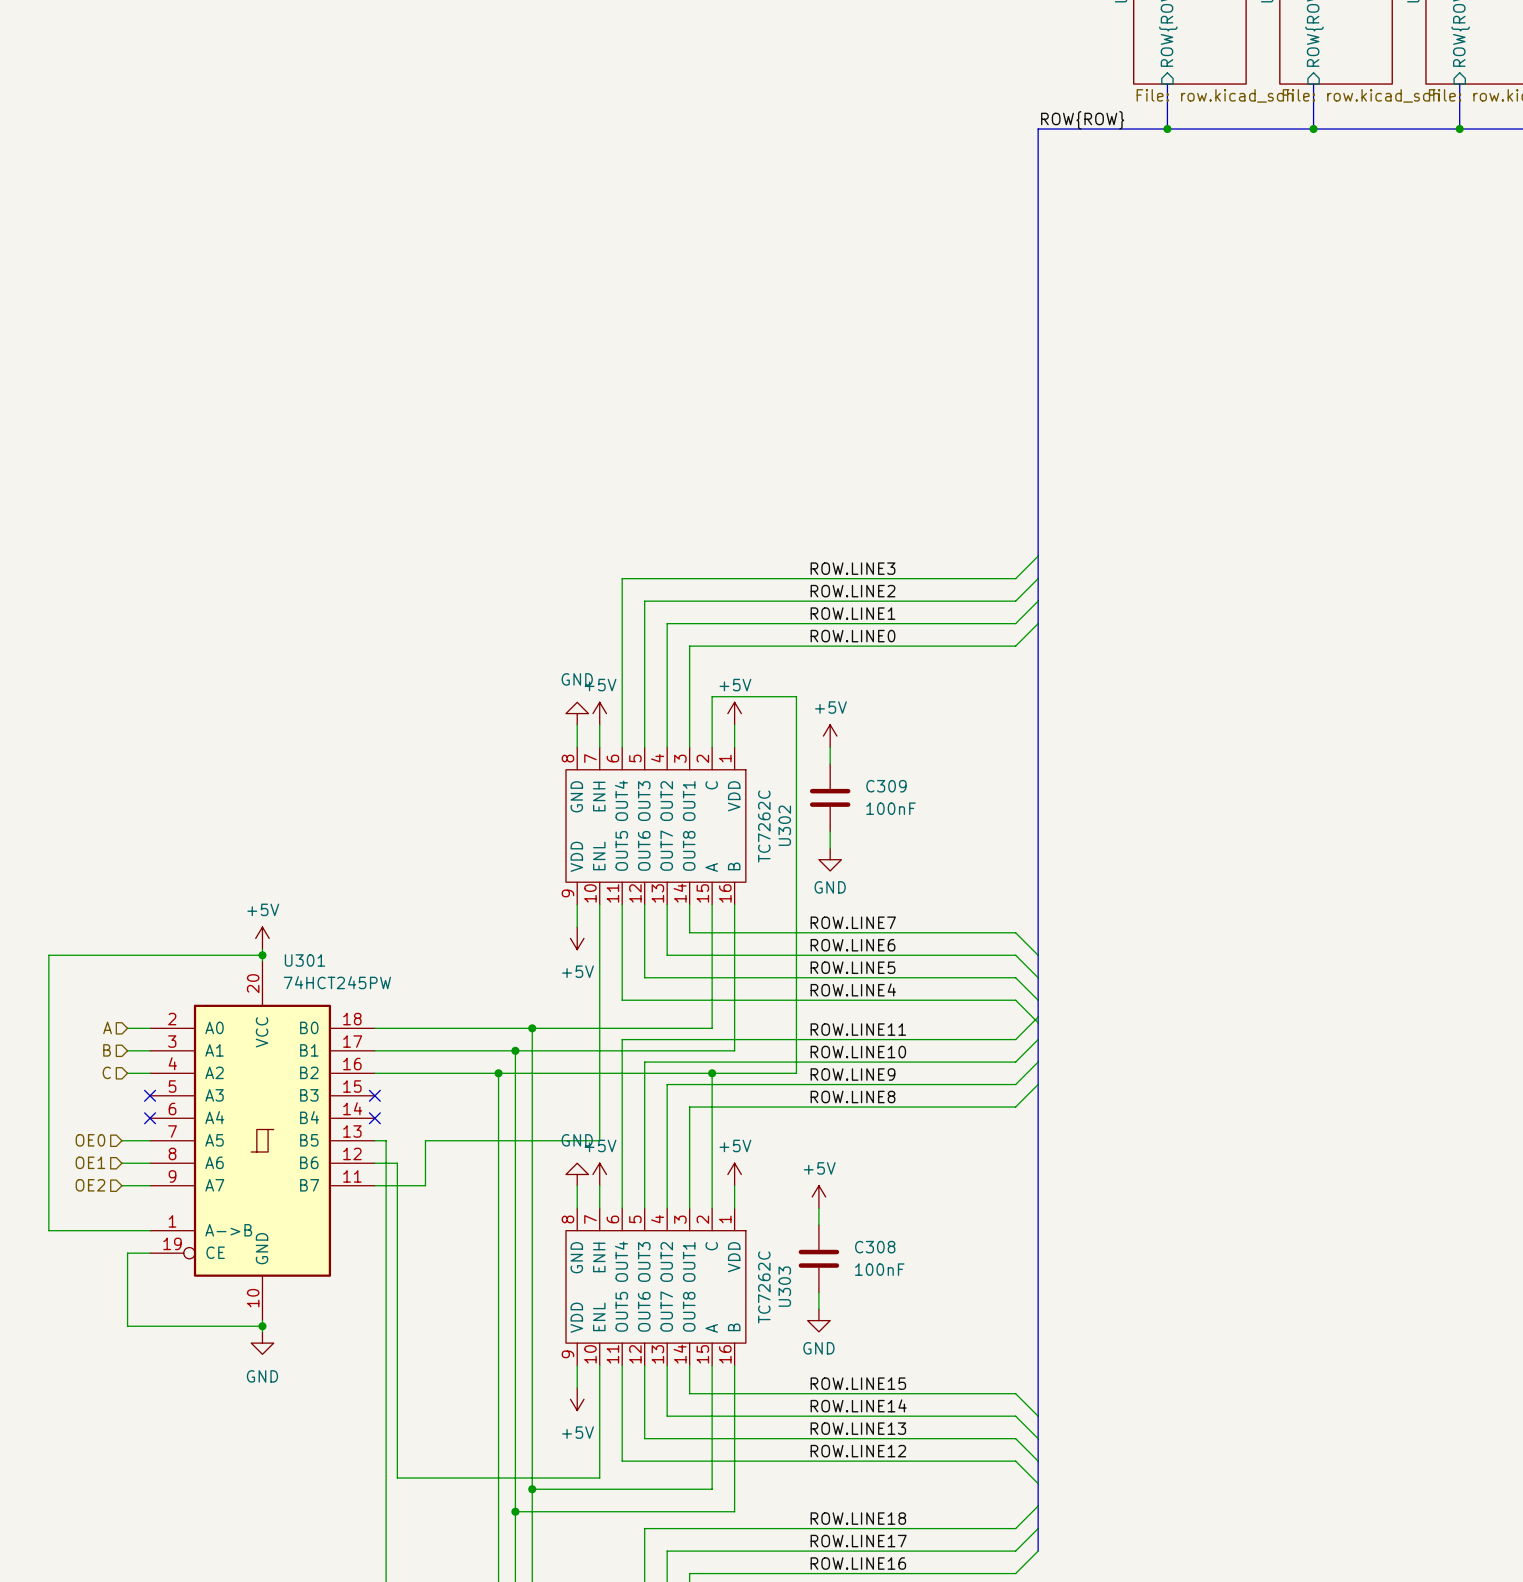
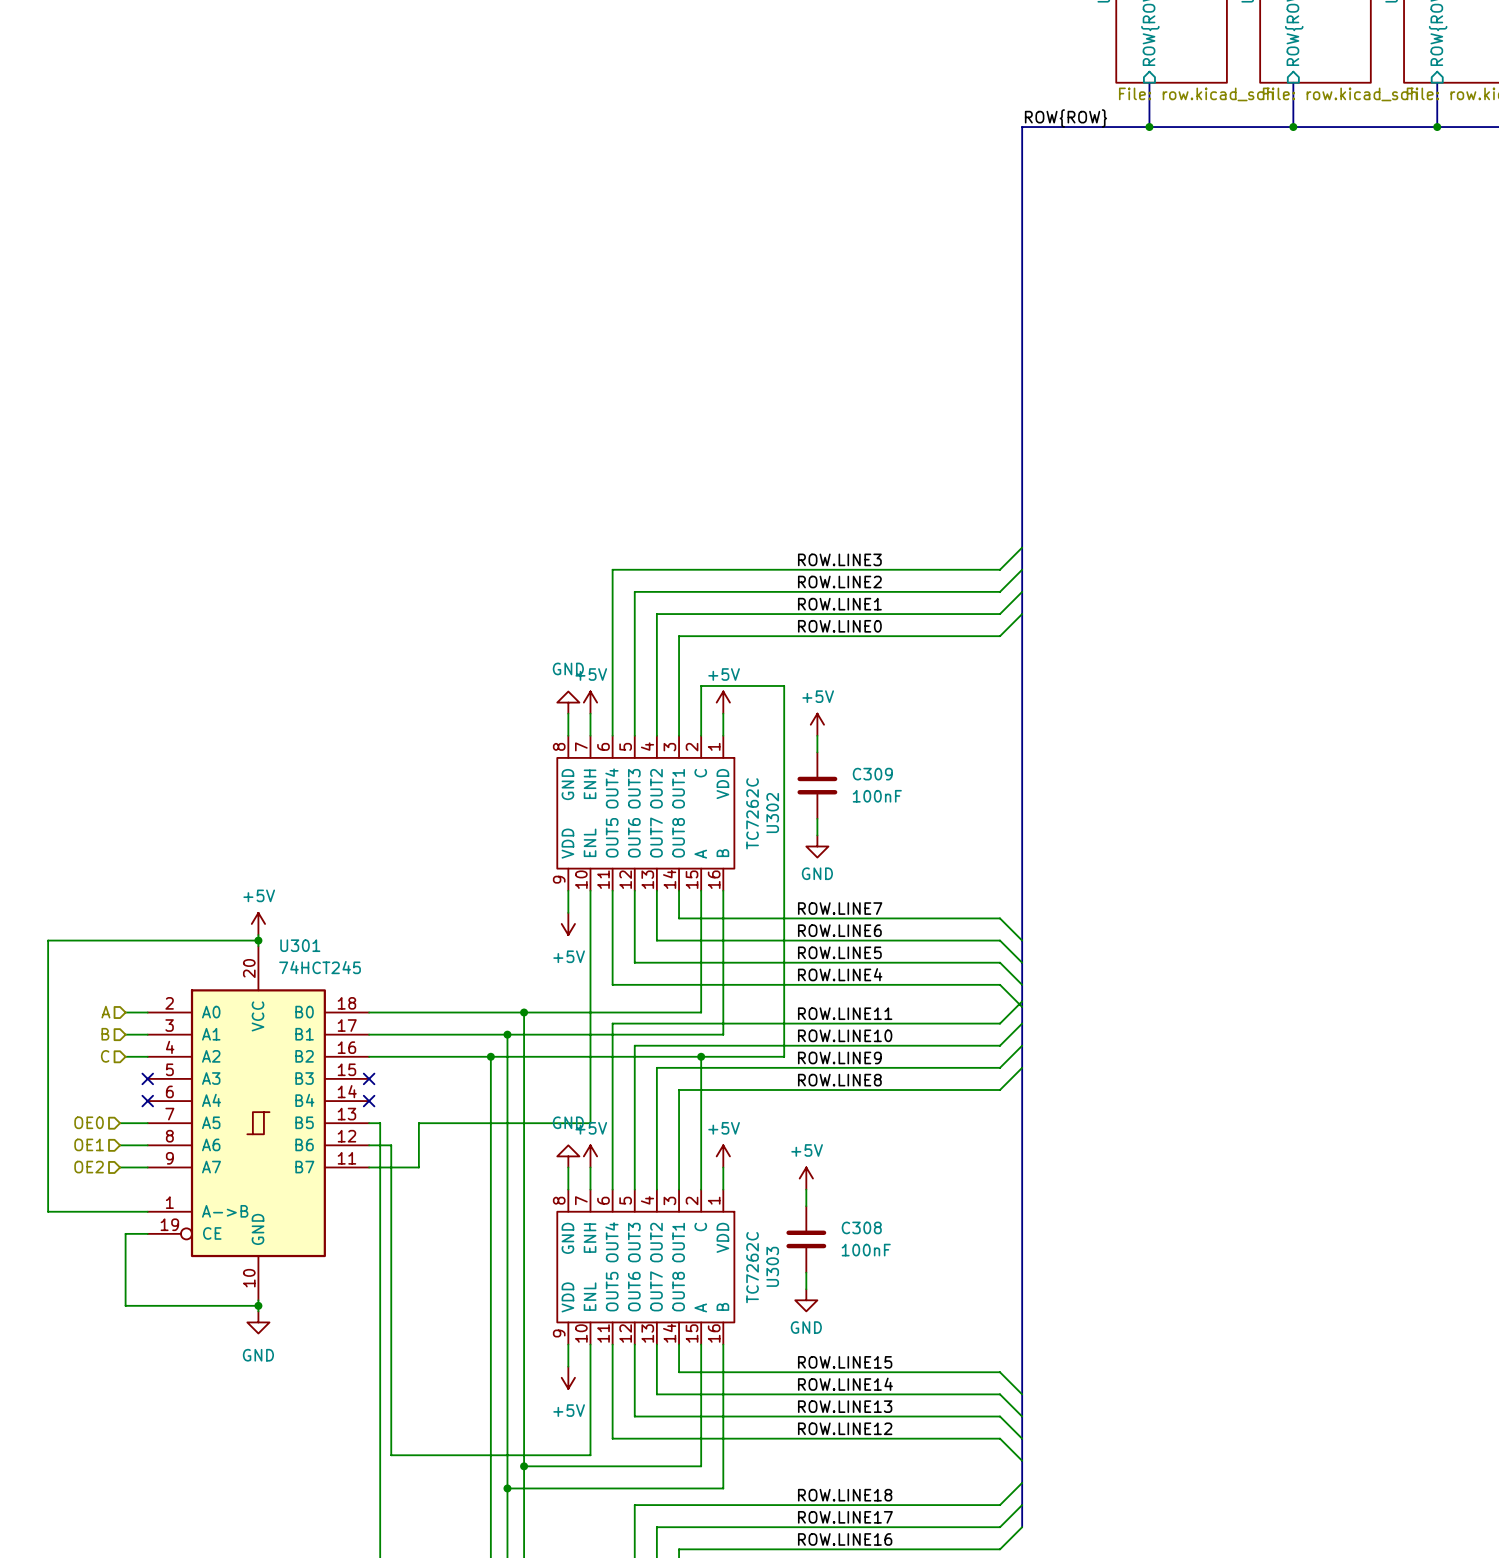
U301 value: 74HCT245PW (337, 982) -> 74HCT245 (320, 967)

